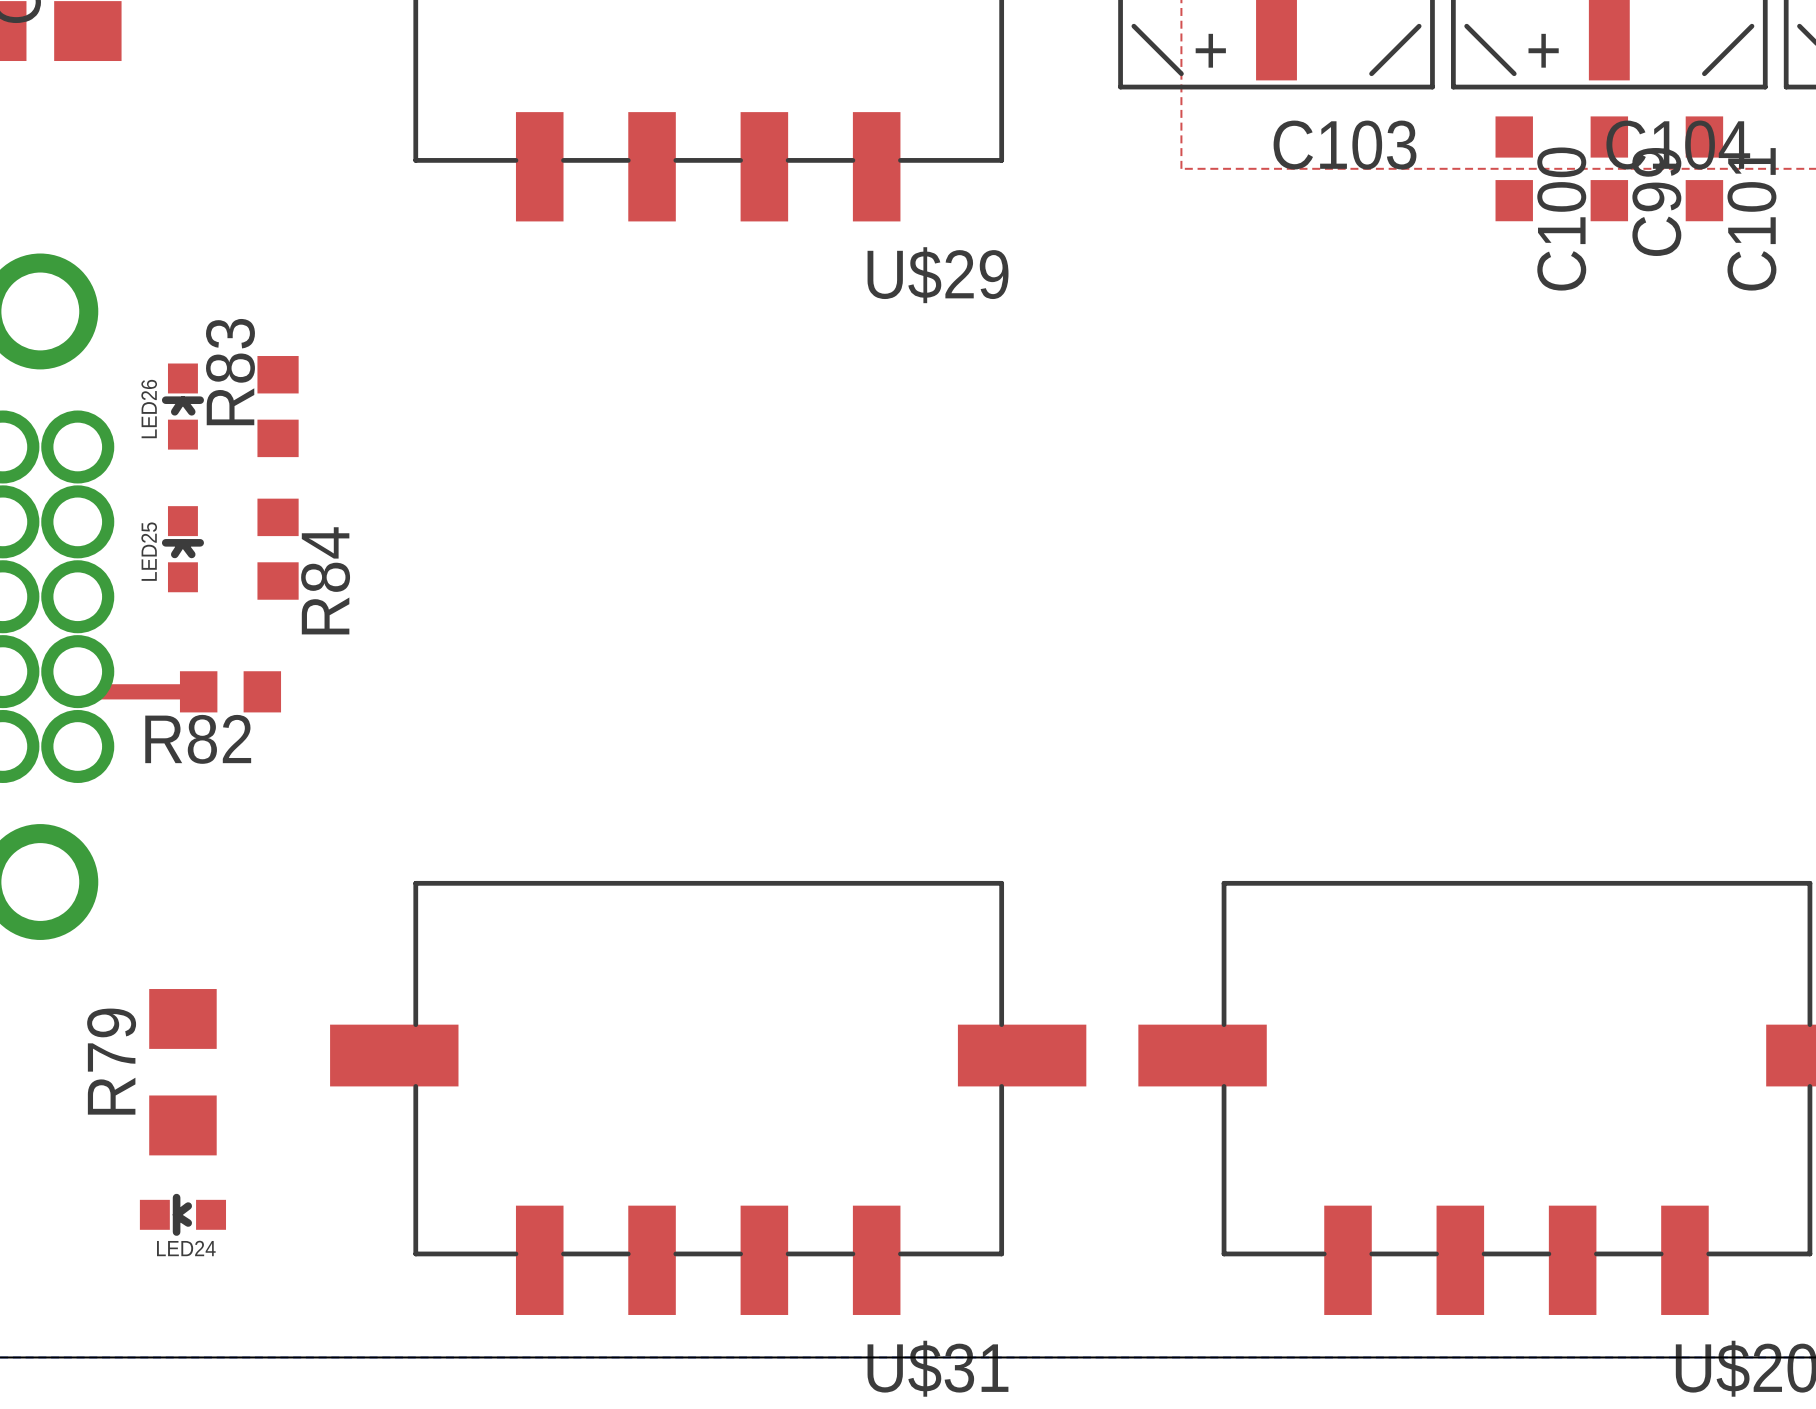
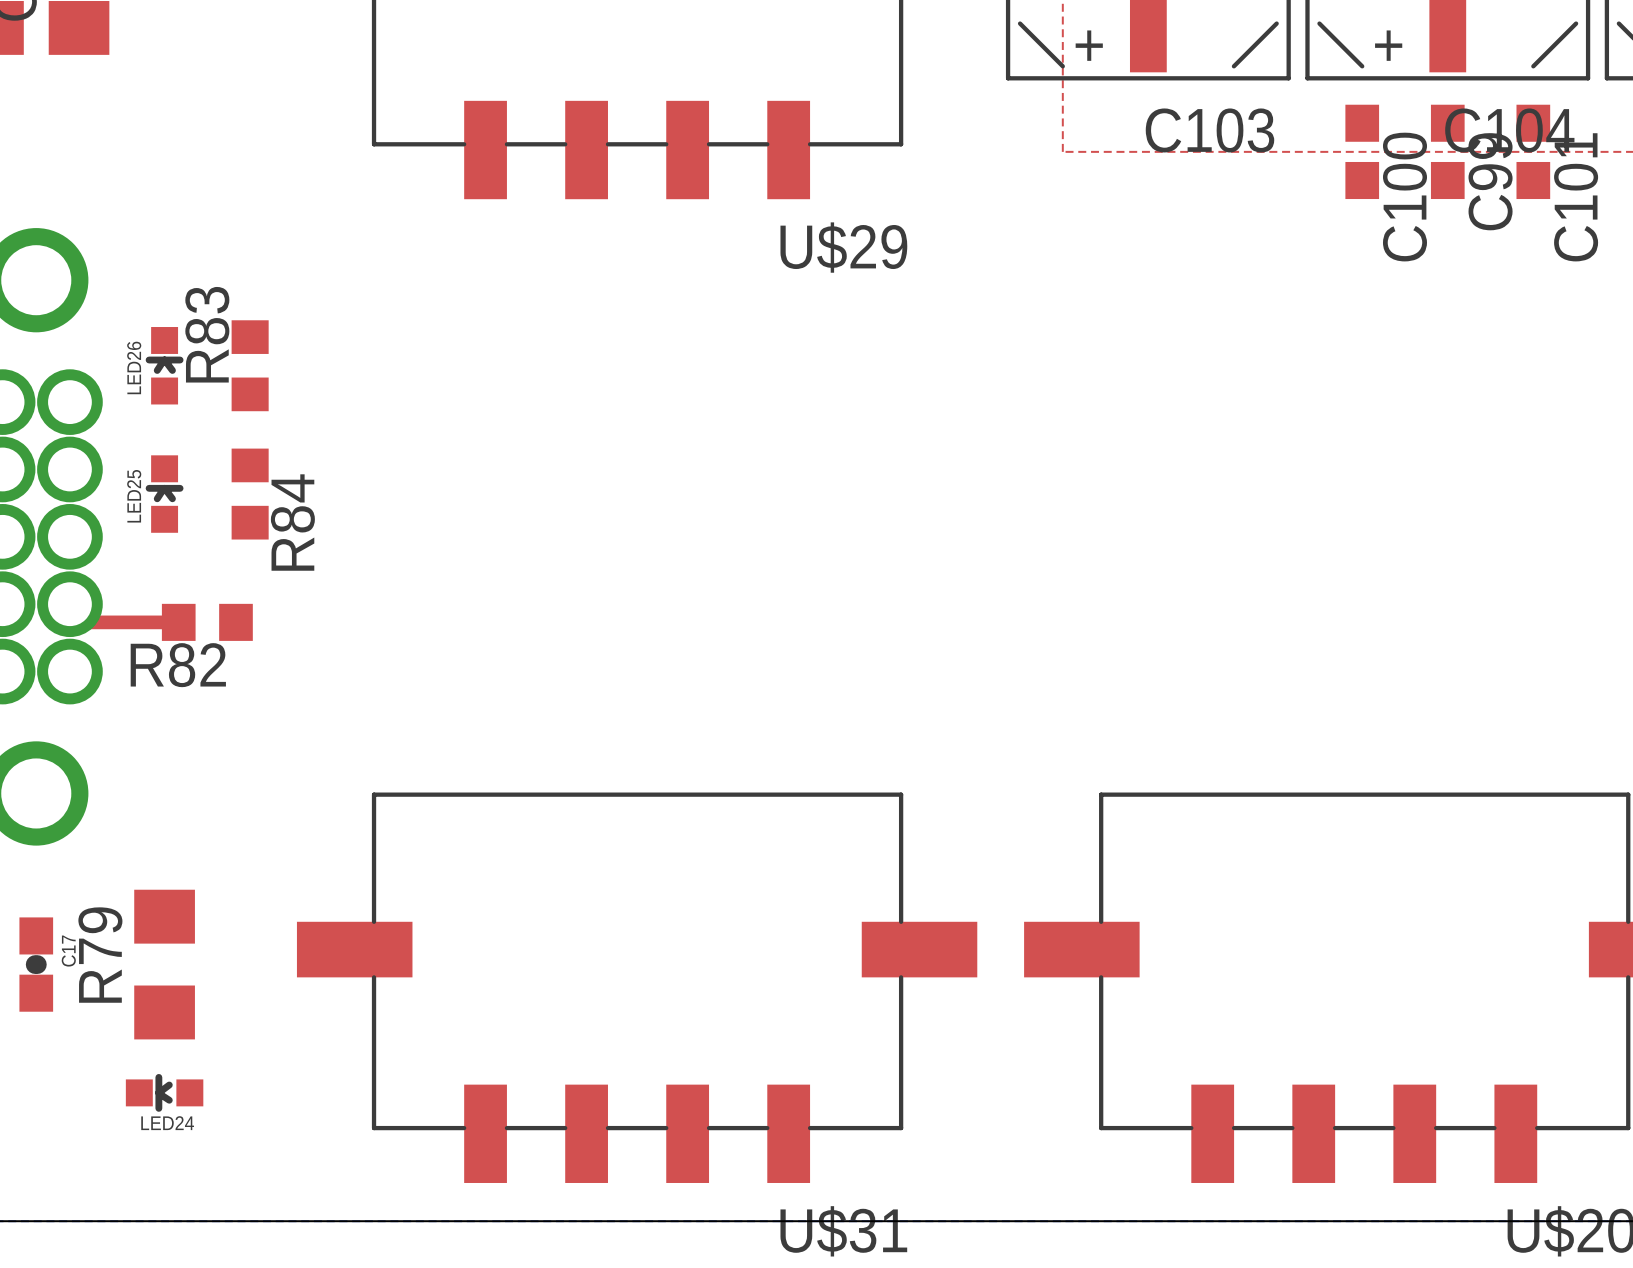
C17: none -> (36, 964)

